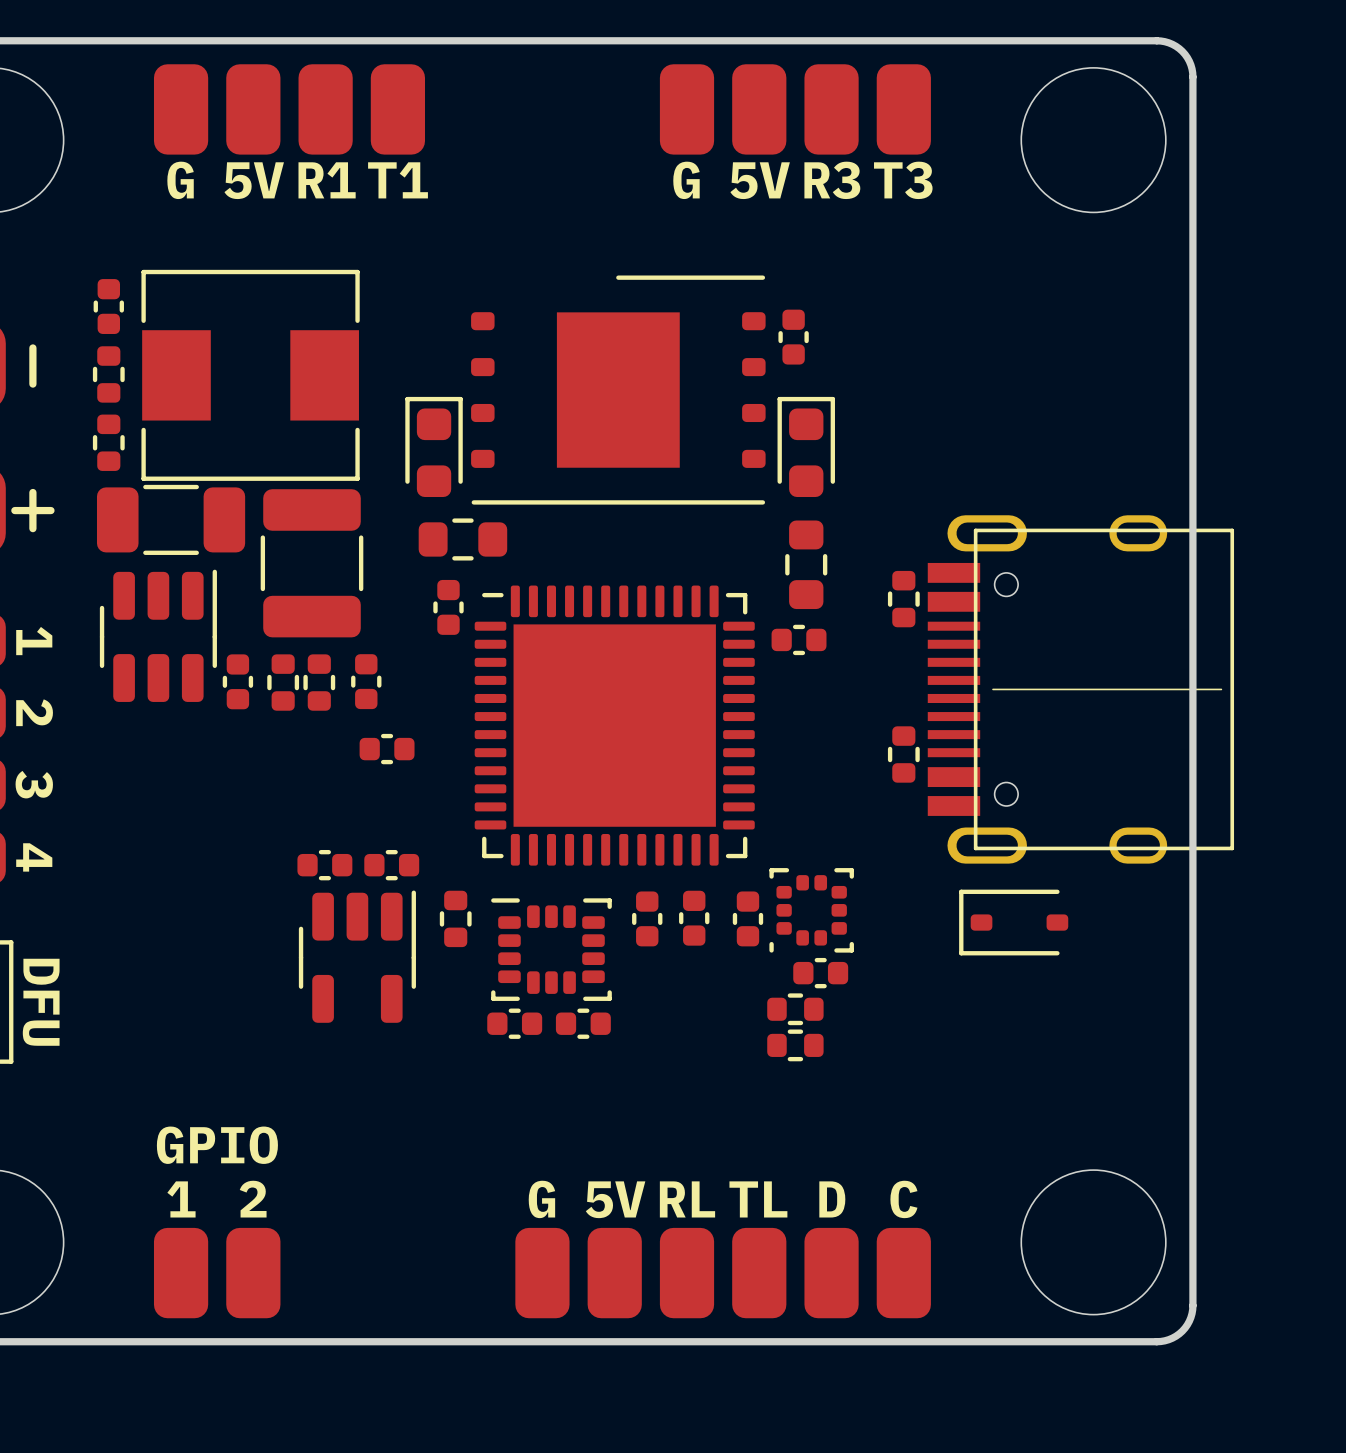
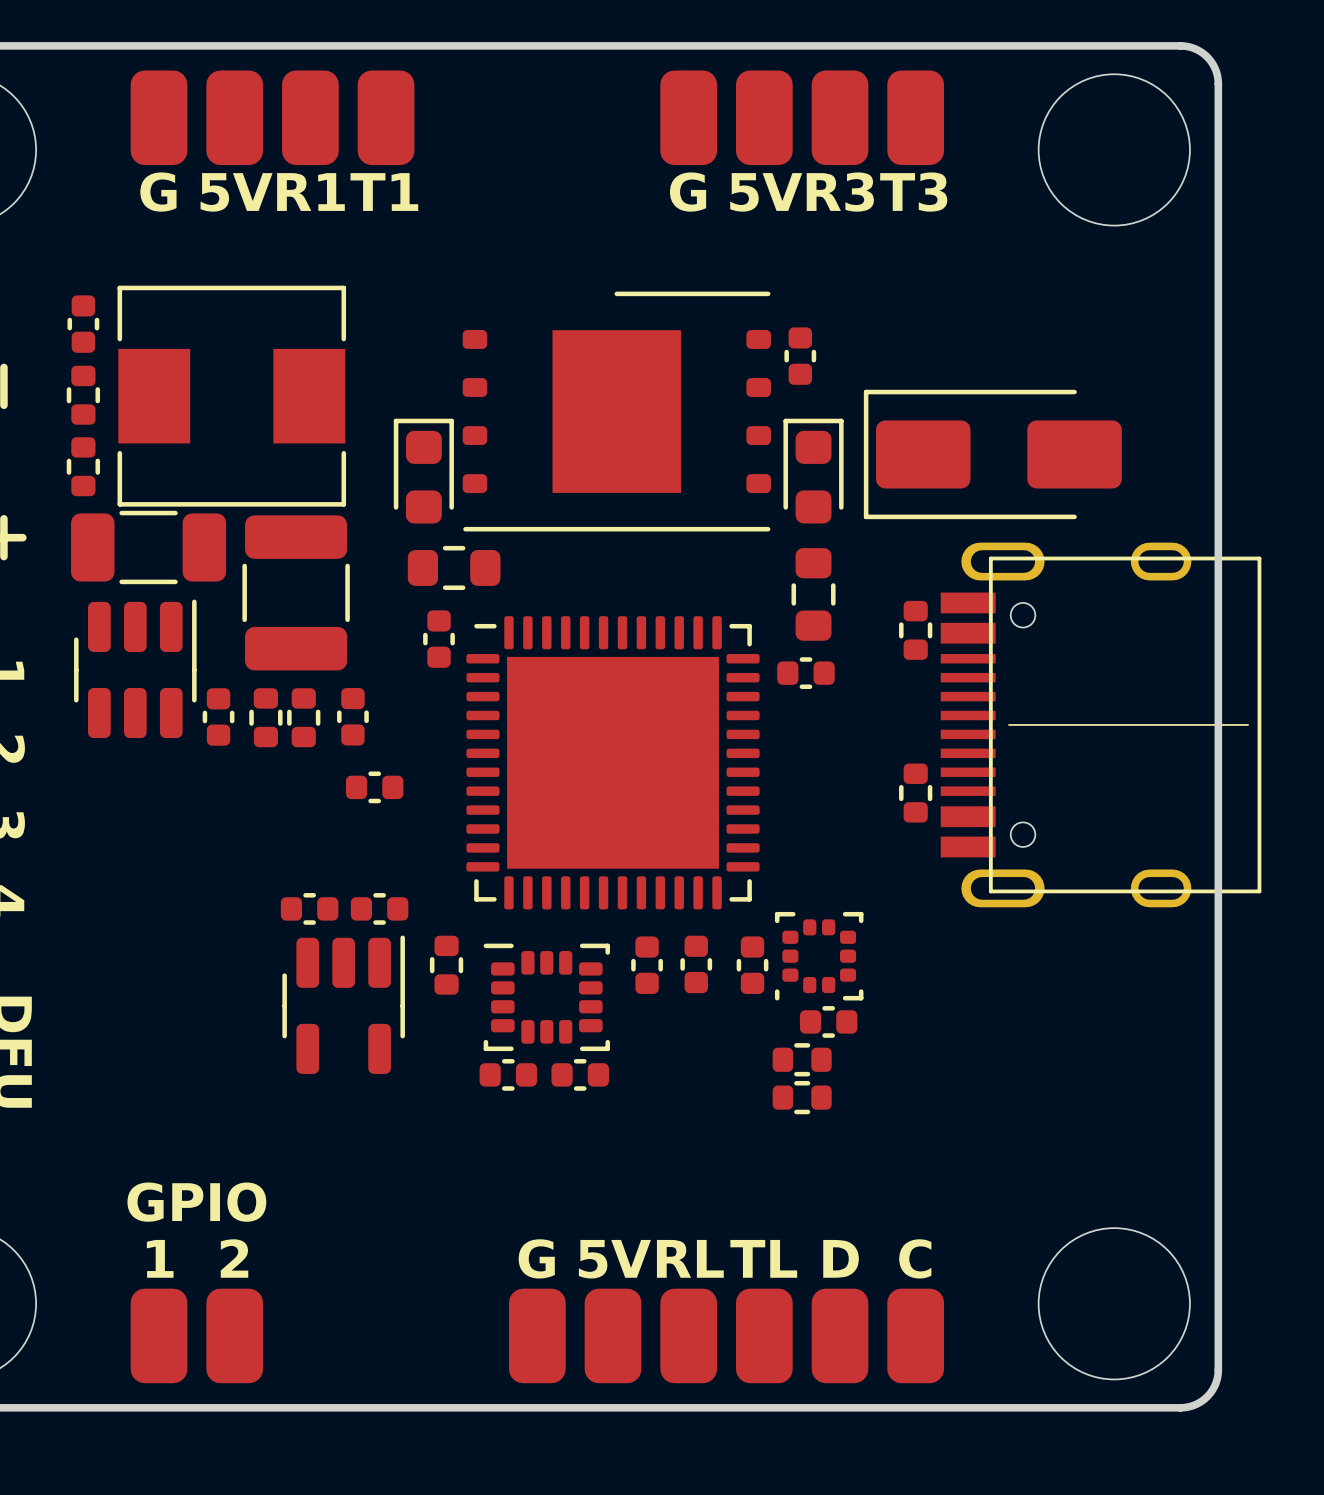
part: none -> (992, 454)
part: (1013, 922) -> none

